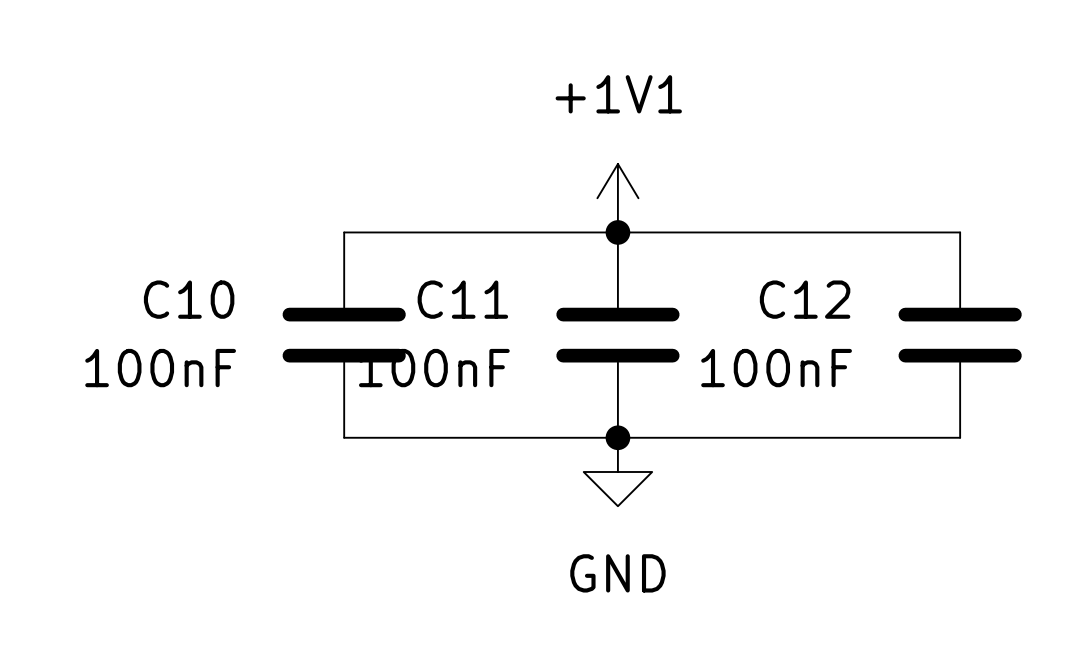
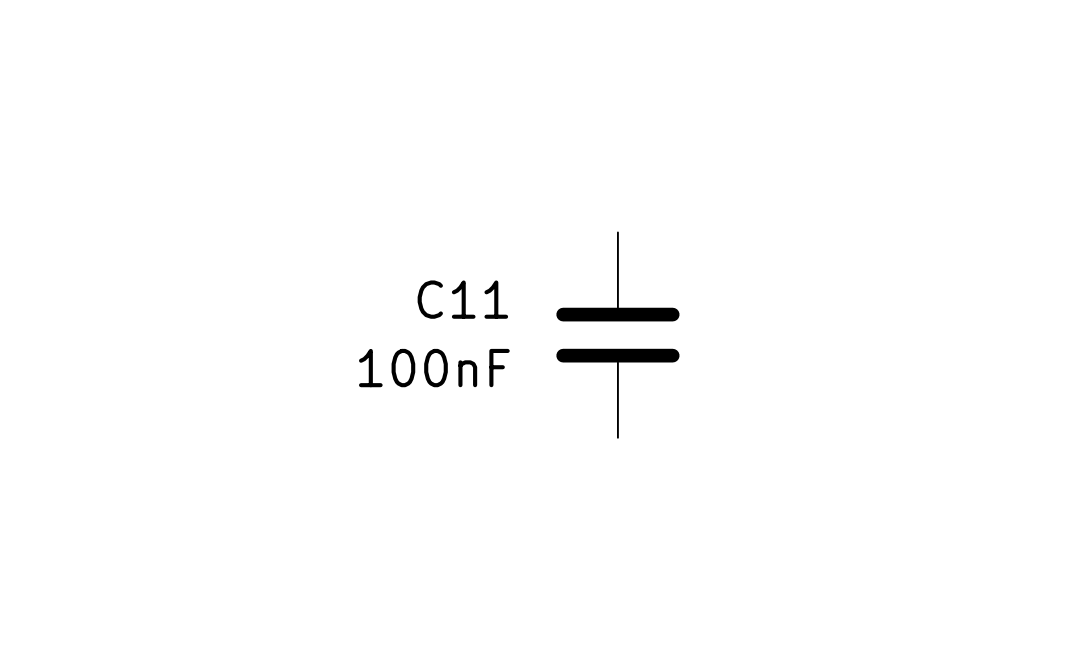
power symbol: +1V1 (617, 198) -> none
wire: (344, 232) (960, 232) -> none
junction: (617, 232) -> none
C10: 100nF (344, 335) -> none
C12: 100nF (960, 335) -> none
wire: (344, 437) (960, 437) -> none
junction: (617, 437) -> none
power symbol: GND (617, 471) -> none

